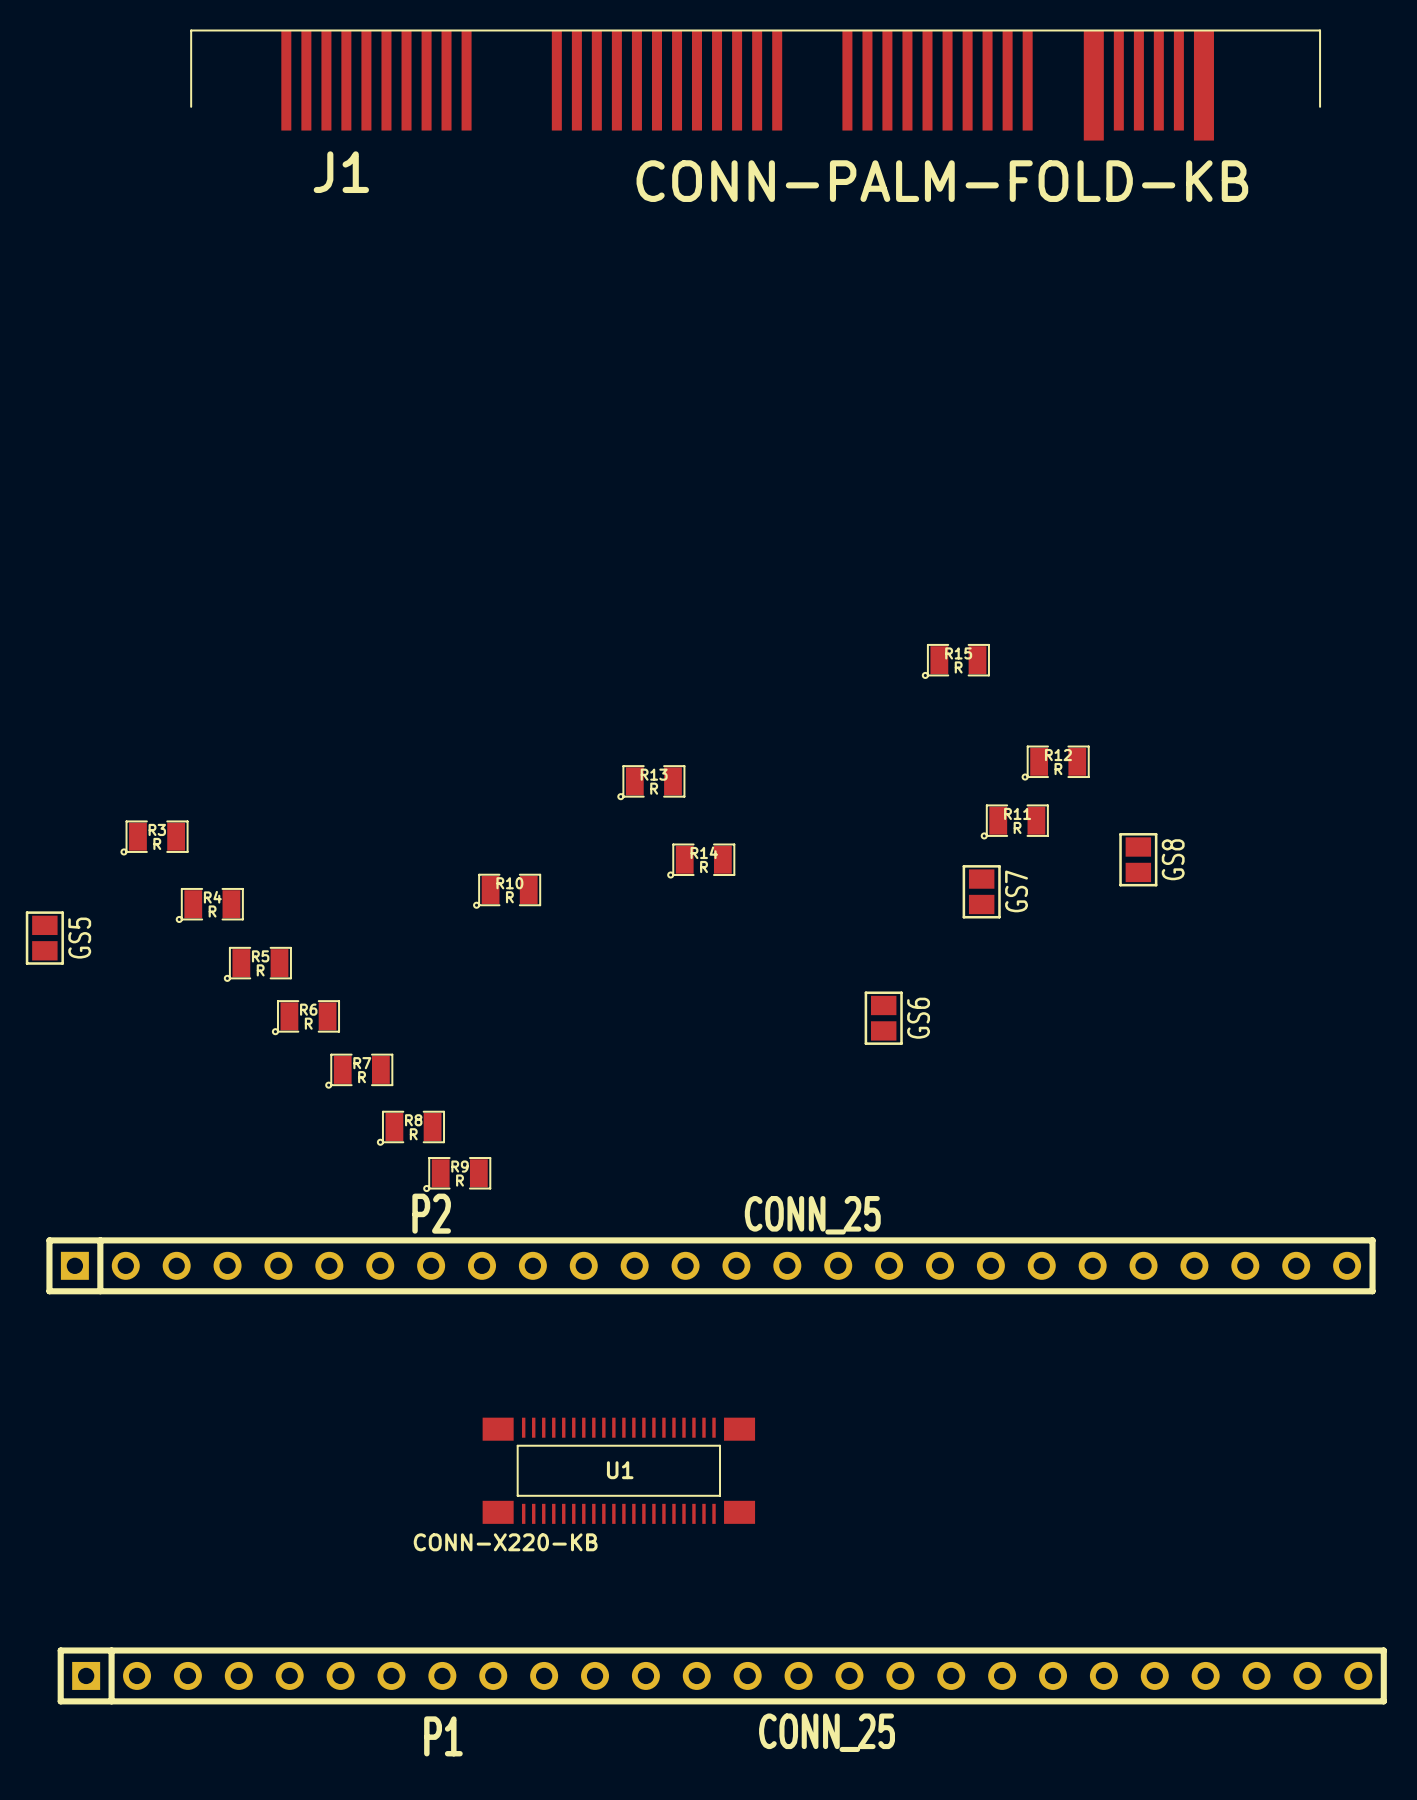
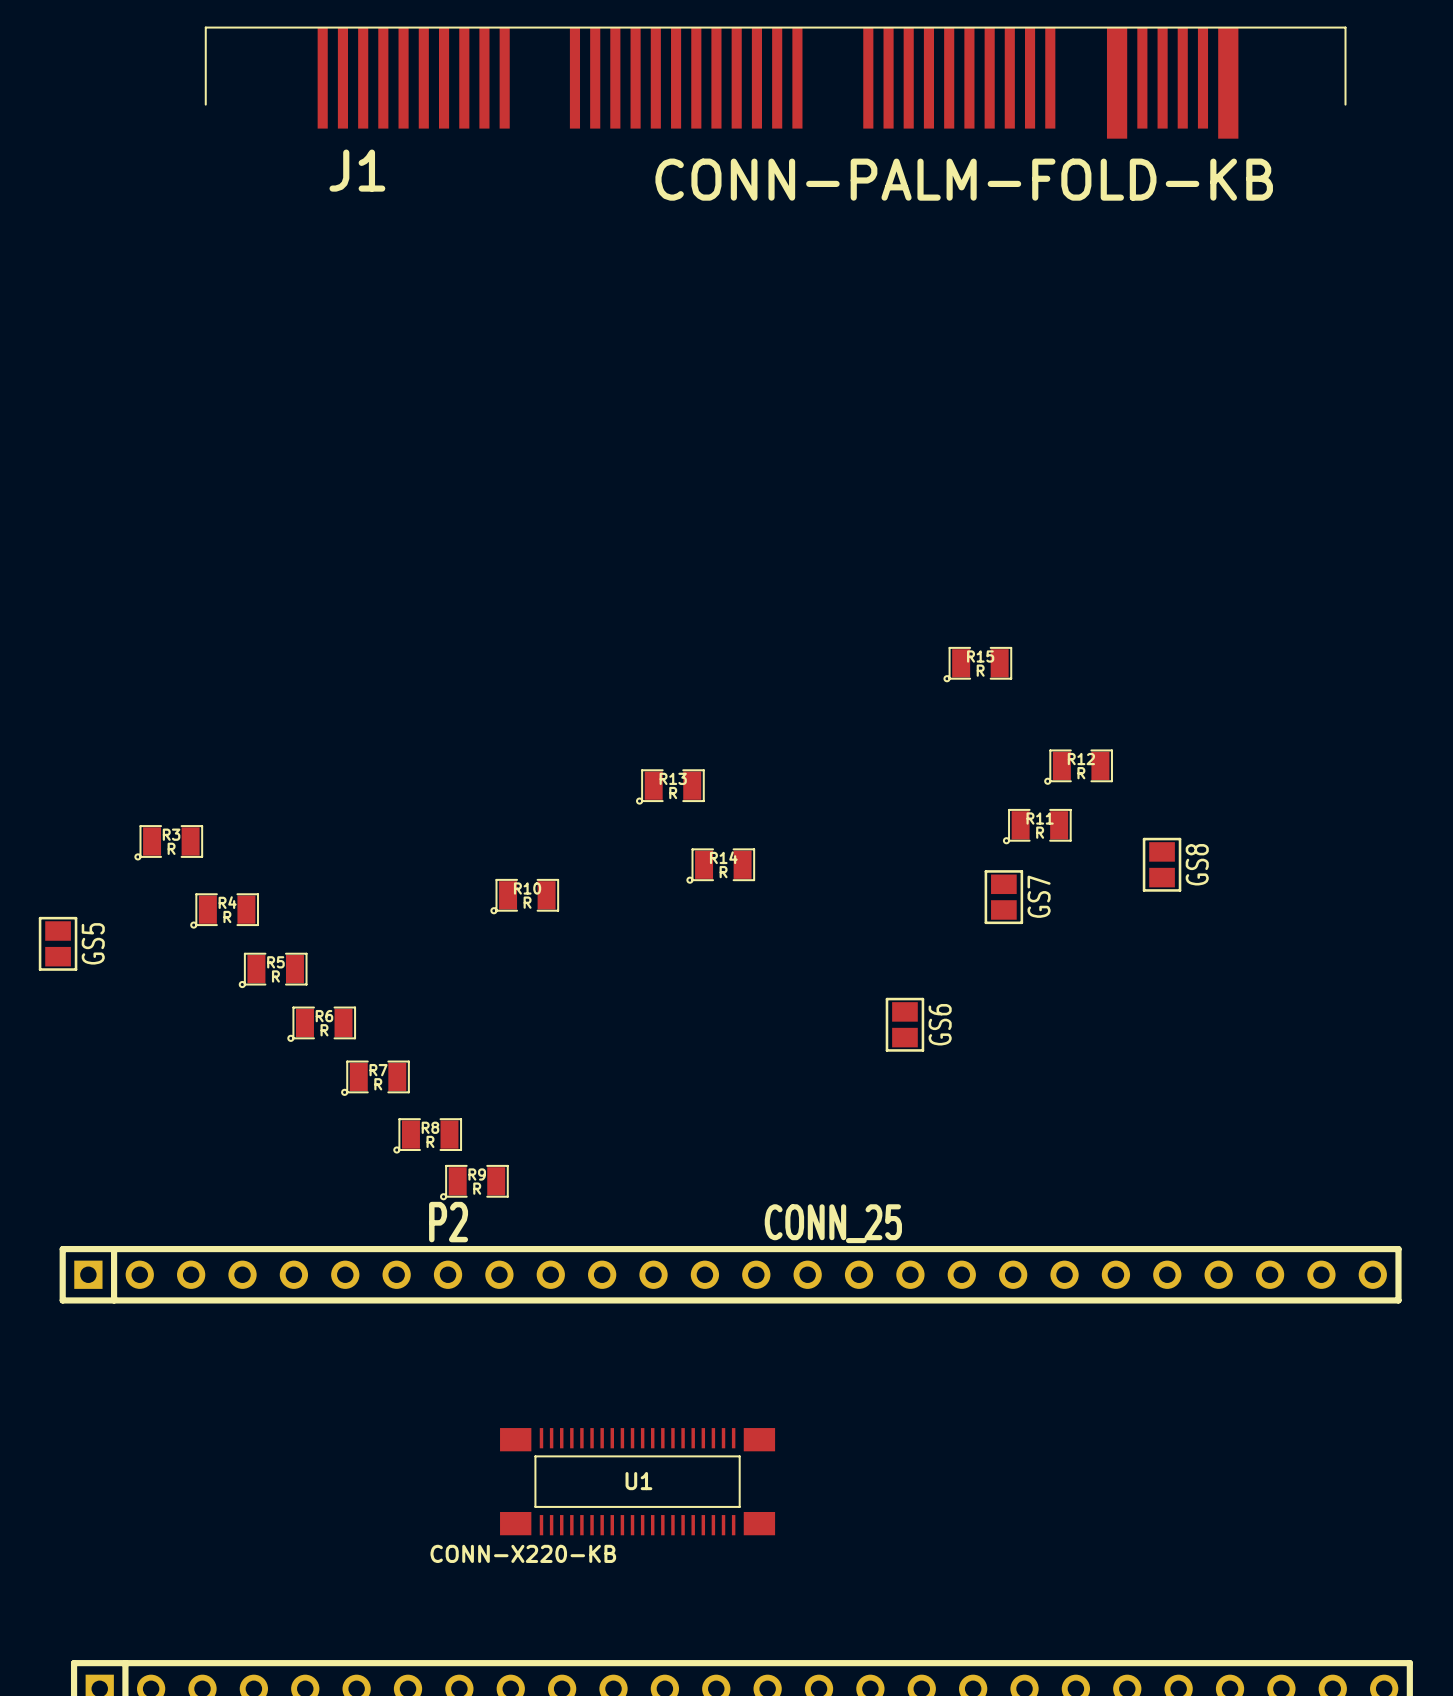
J1 footprint: [190, 29, 1322, 141] -> [204, 26, 1347, 139]

